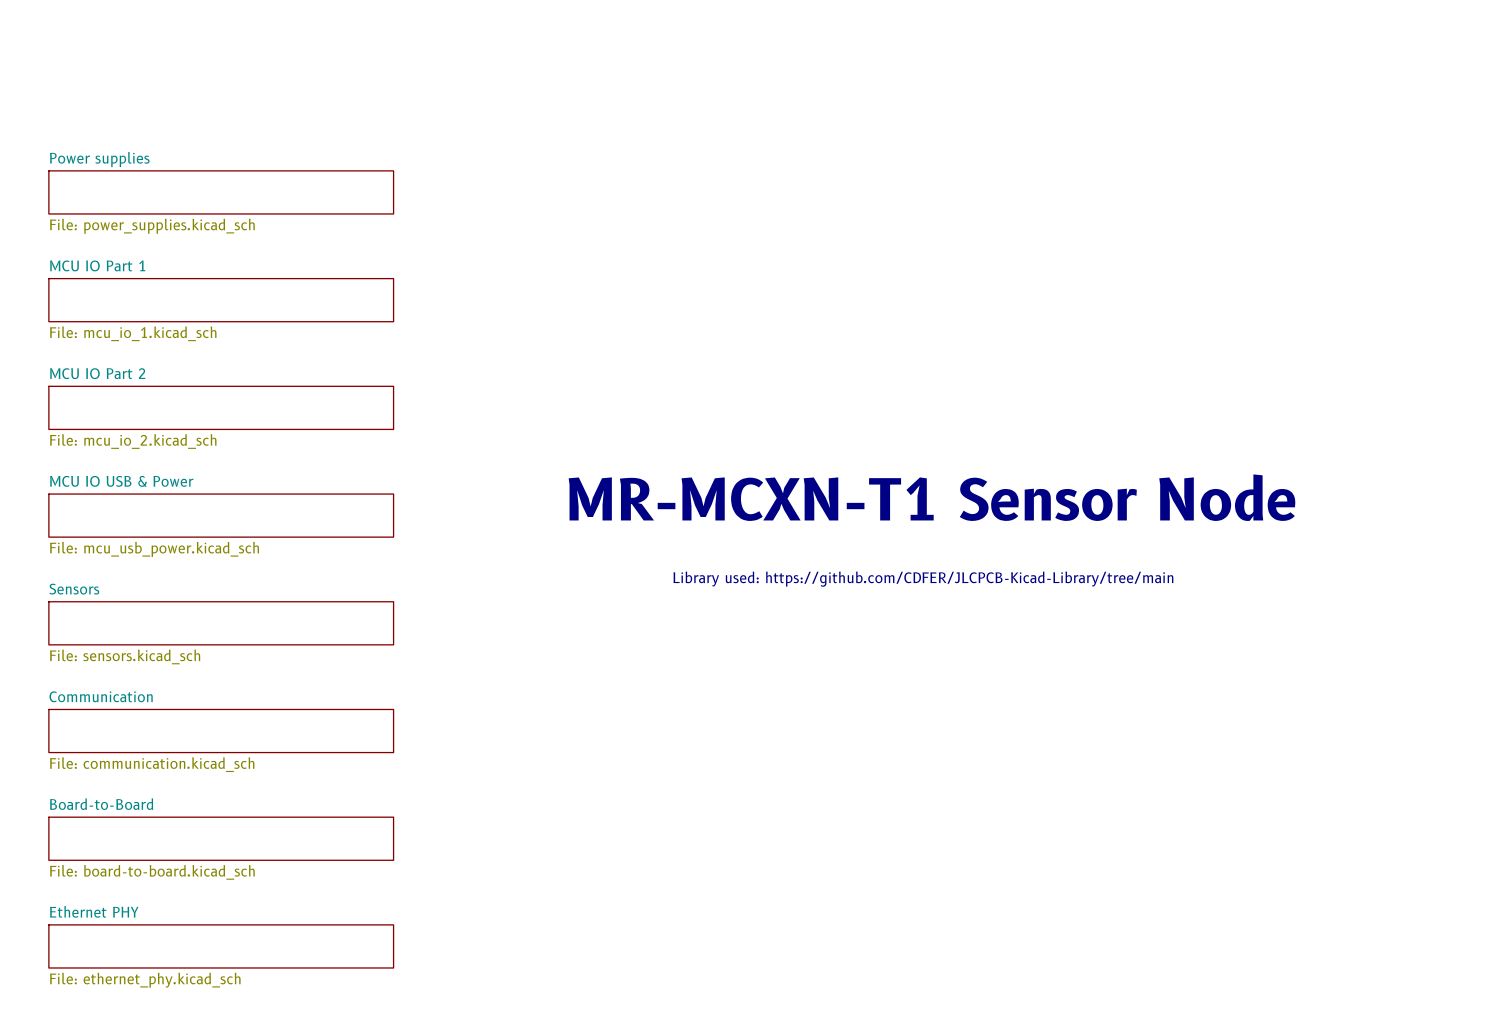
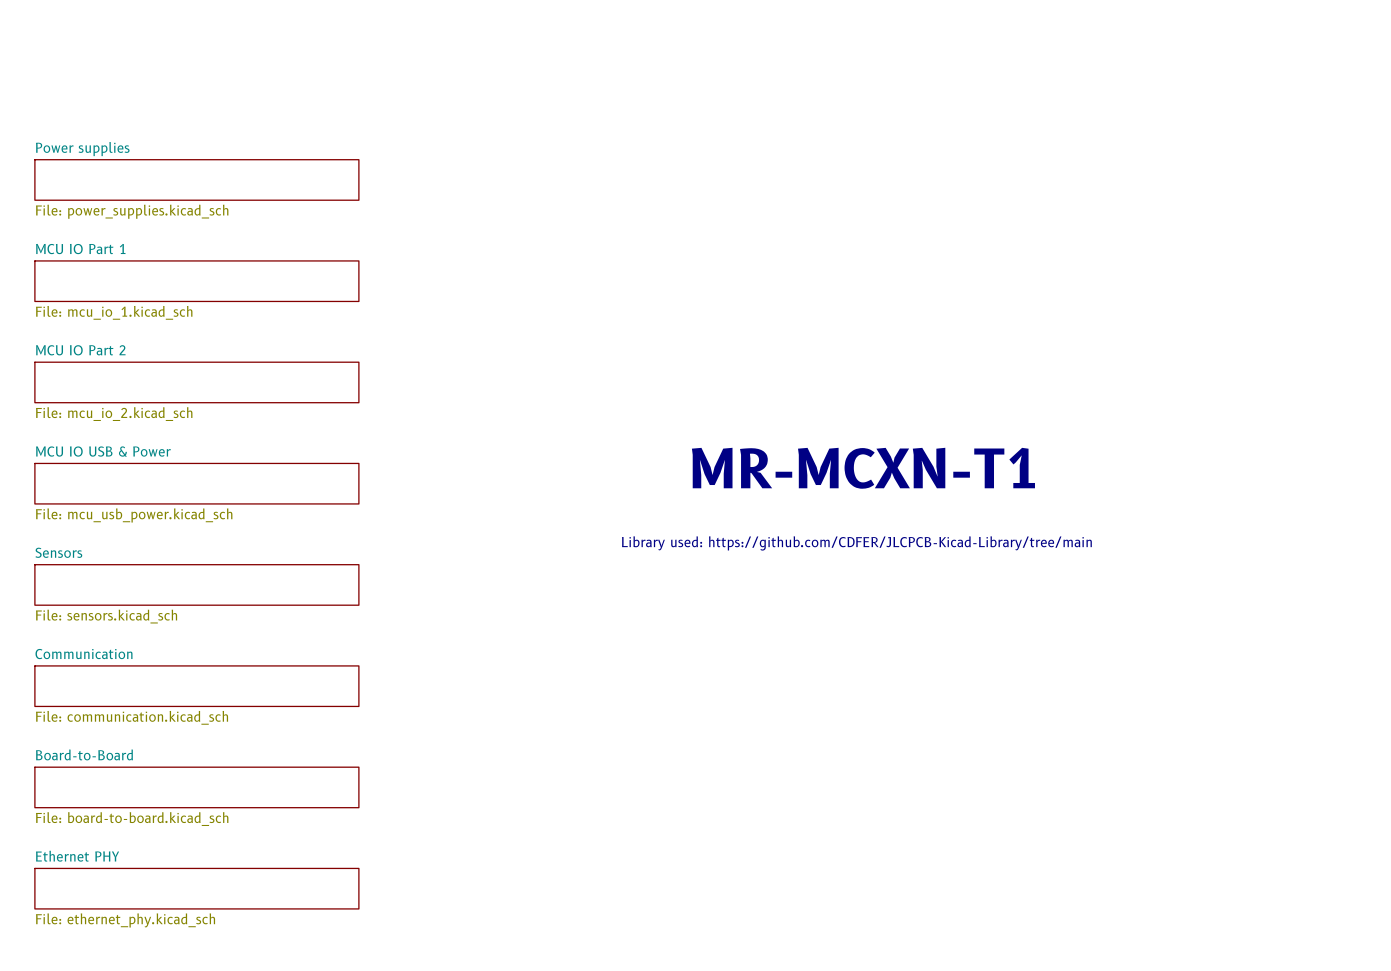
text: MR-MCXN-T1 Sensor Node (931, 497) -> MR-MCXN-T1 (863, 468)

